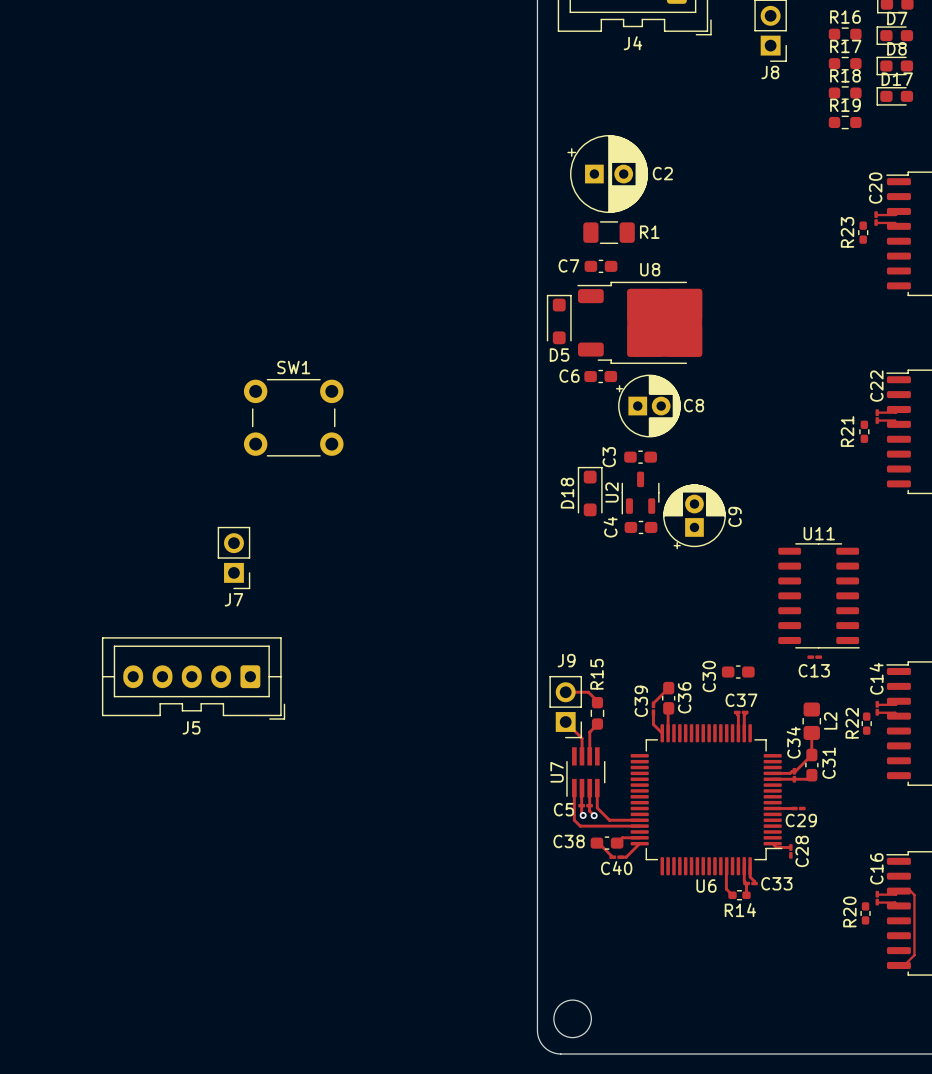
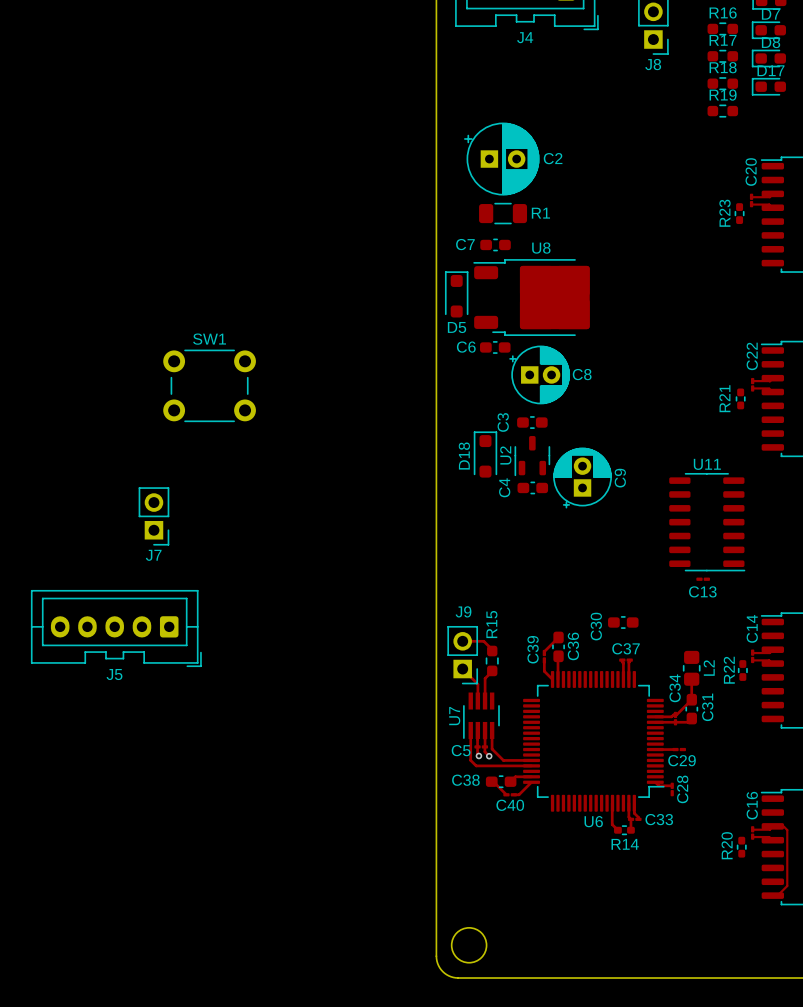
U11 position: (819, 595) -> (707, 522)
C13 position: (814, 657) -> (703, 579)

